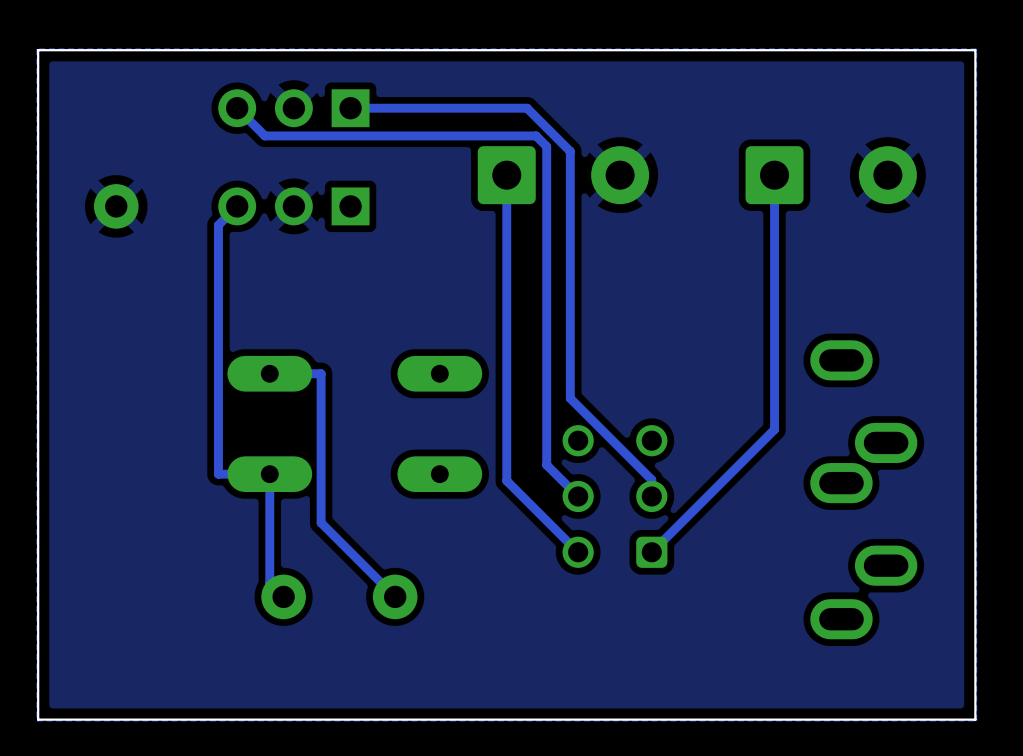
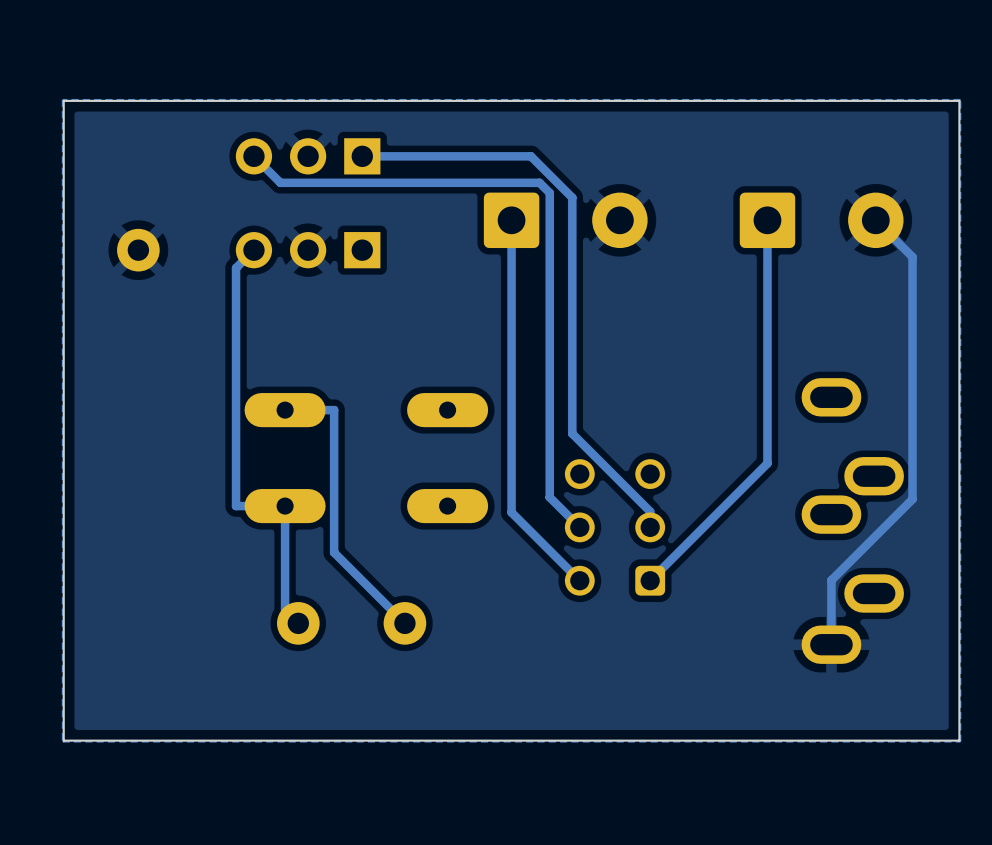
track: none -> (875, 220) (912, 257) (912, 499) (831, 580) (831, 644)

